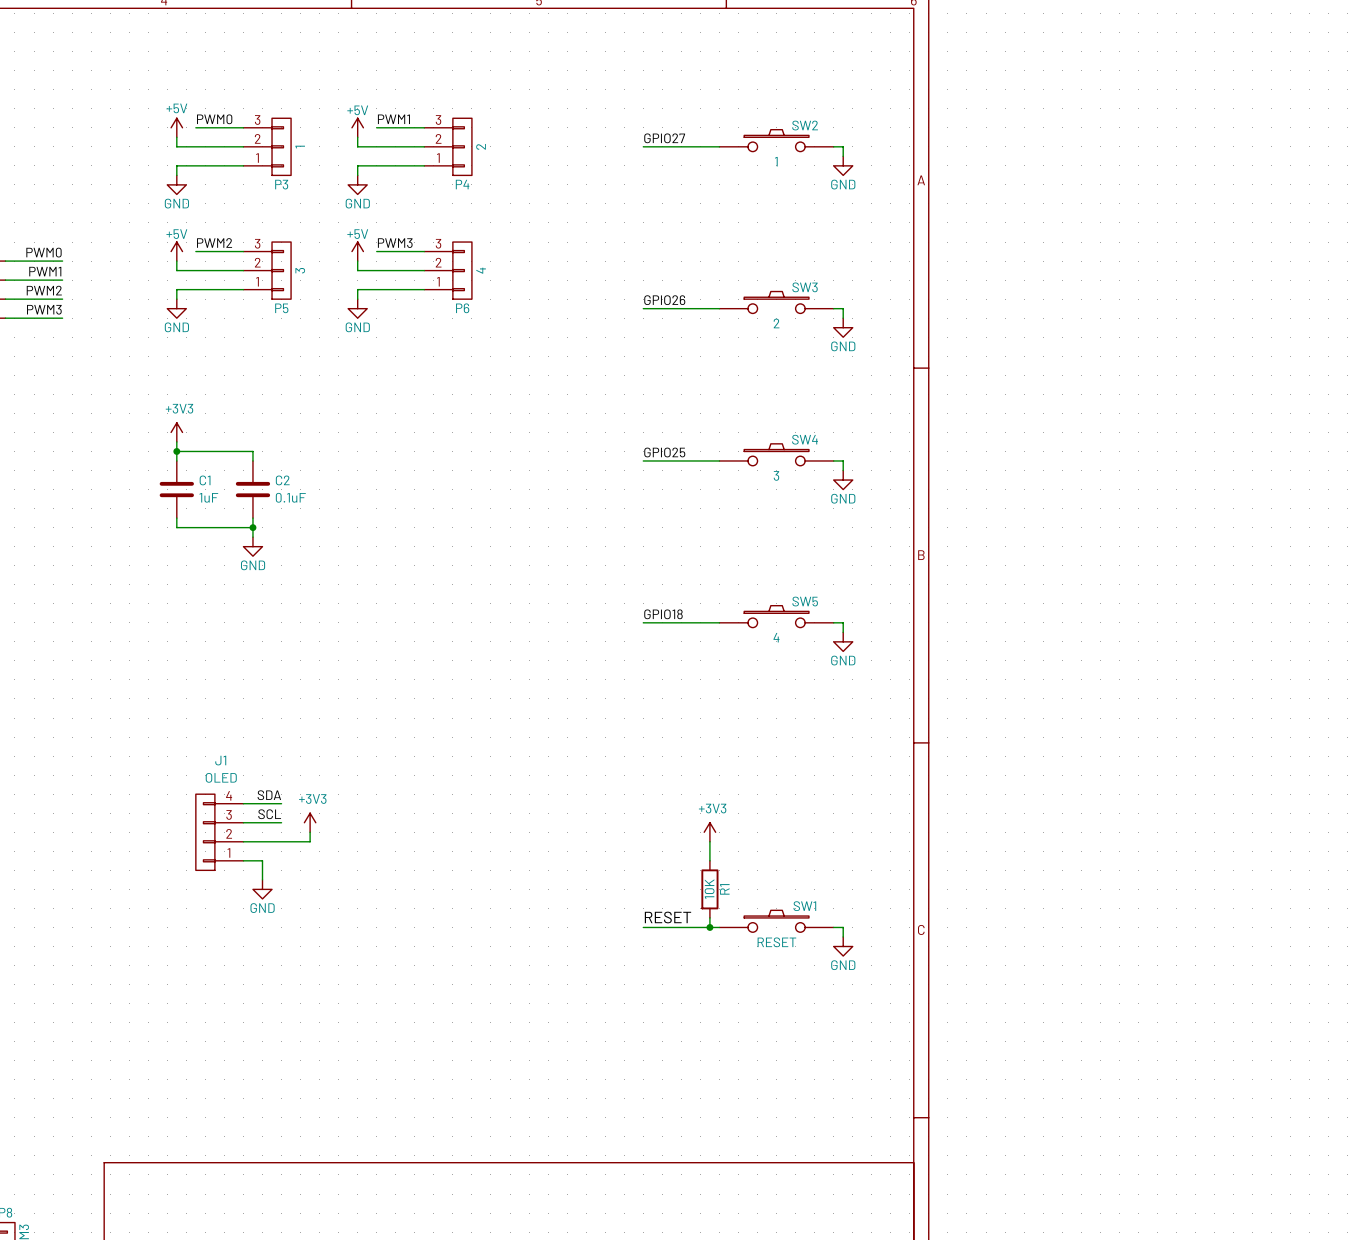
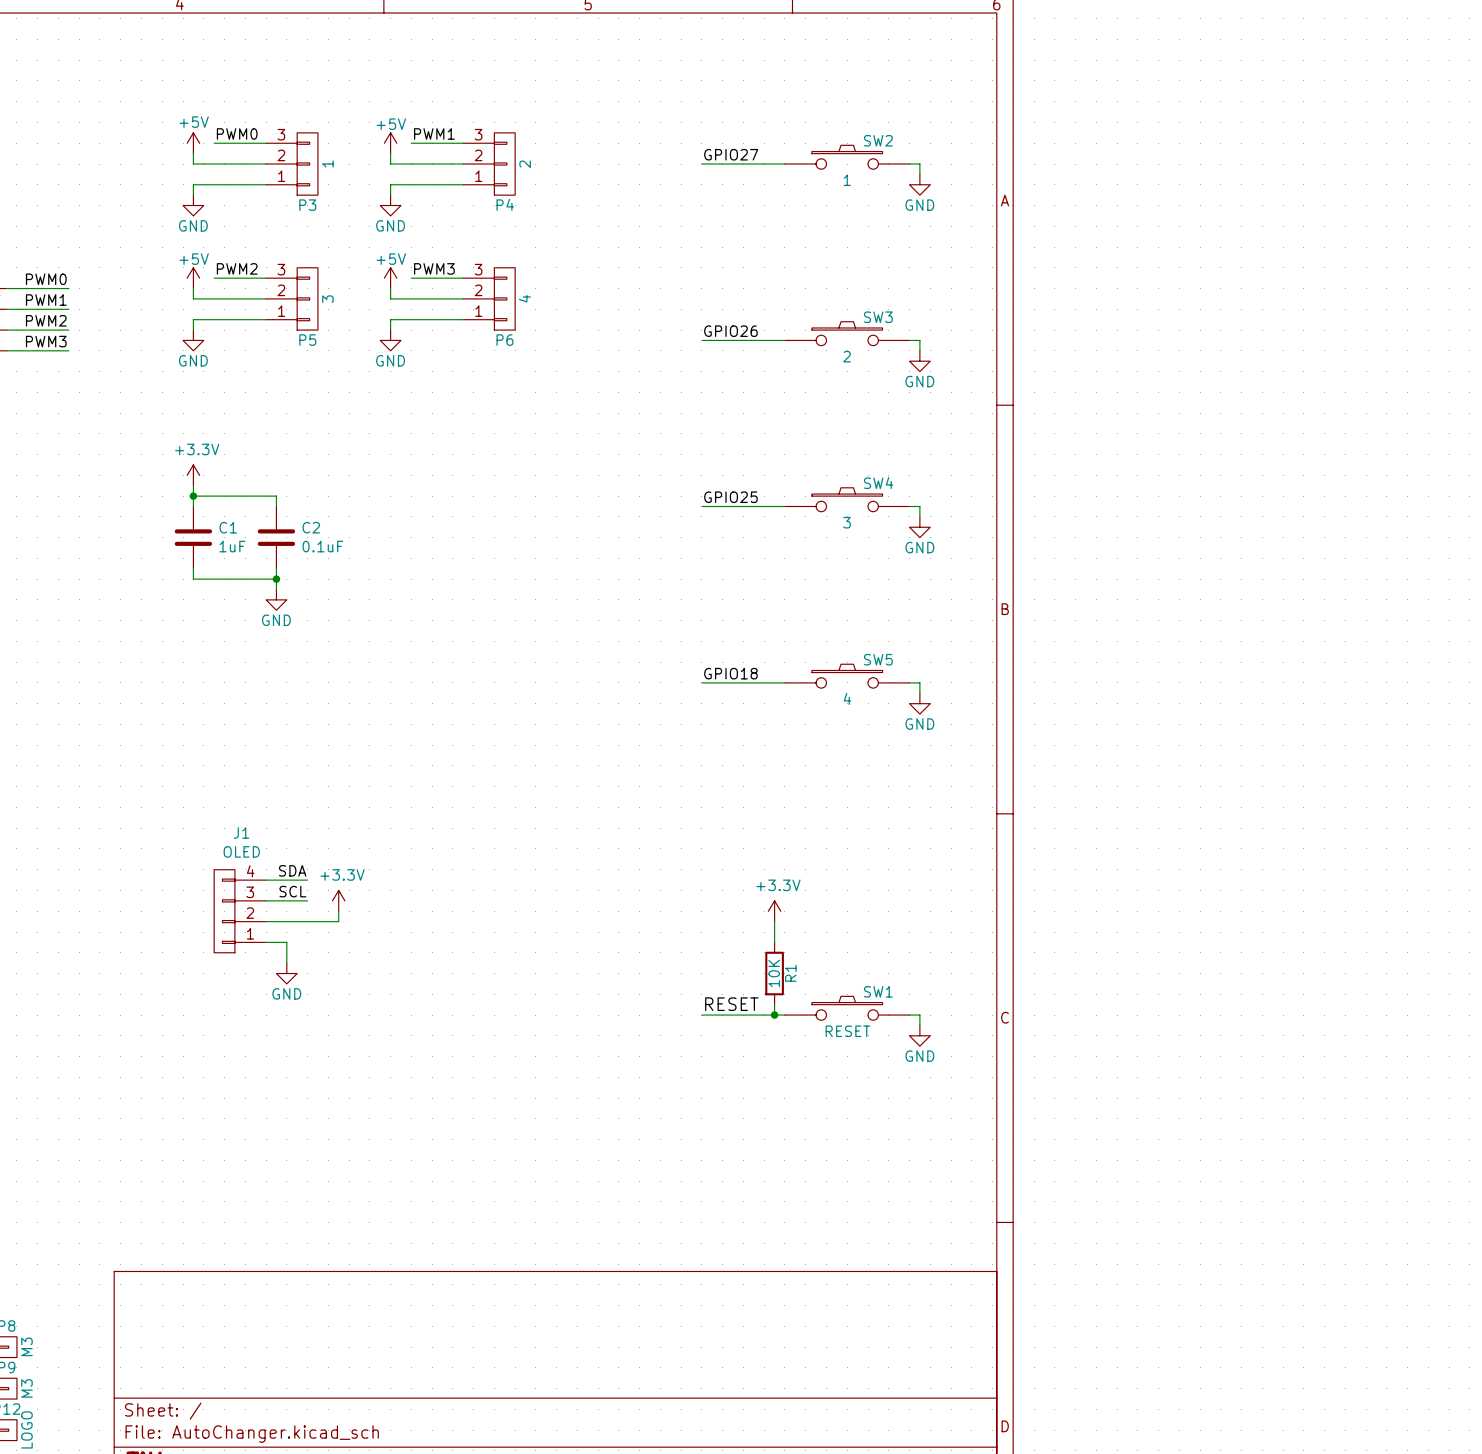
power symbol: +3V3 (176, 432) -> +3.3V (193, 475)
power symbol: +3V3 (310, 822) -> +3.3V (338, 900)
power symbol: +3V3 (709, 832) -> +3.3V (774, 911)

